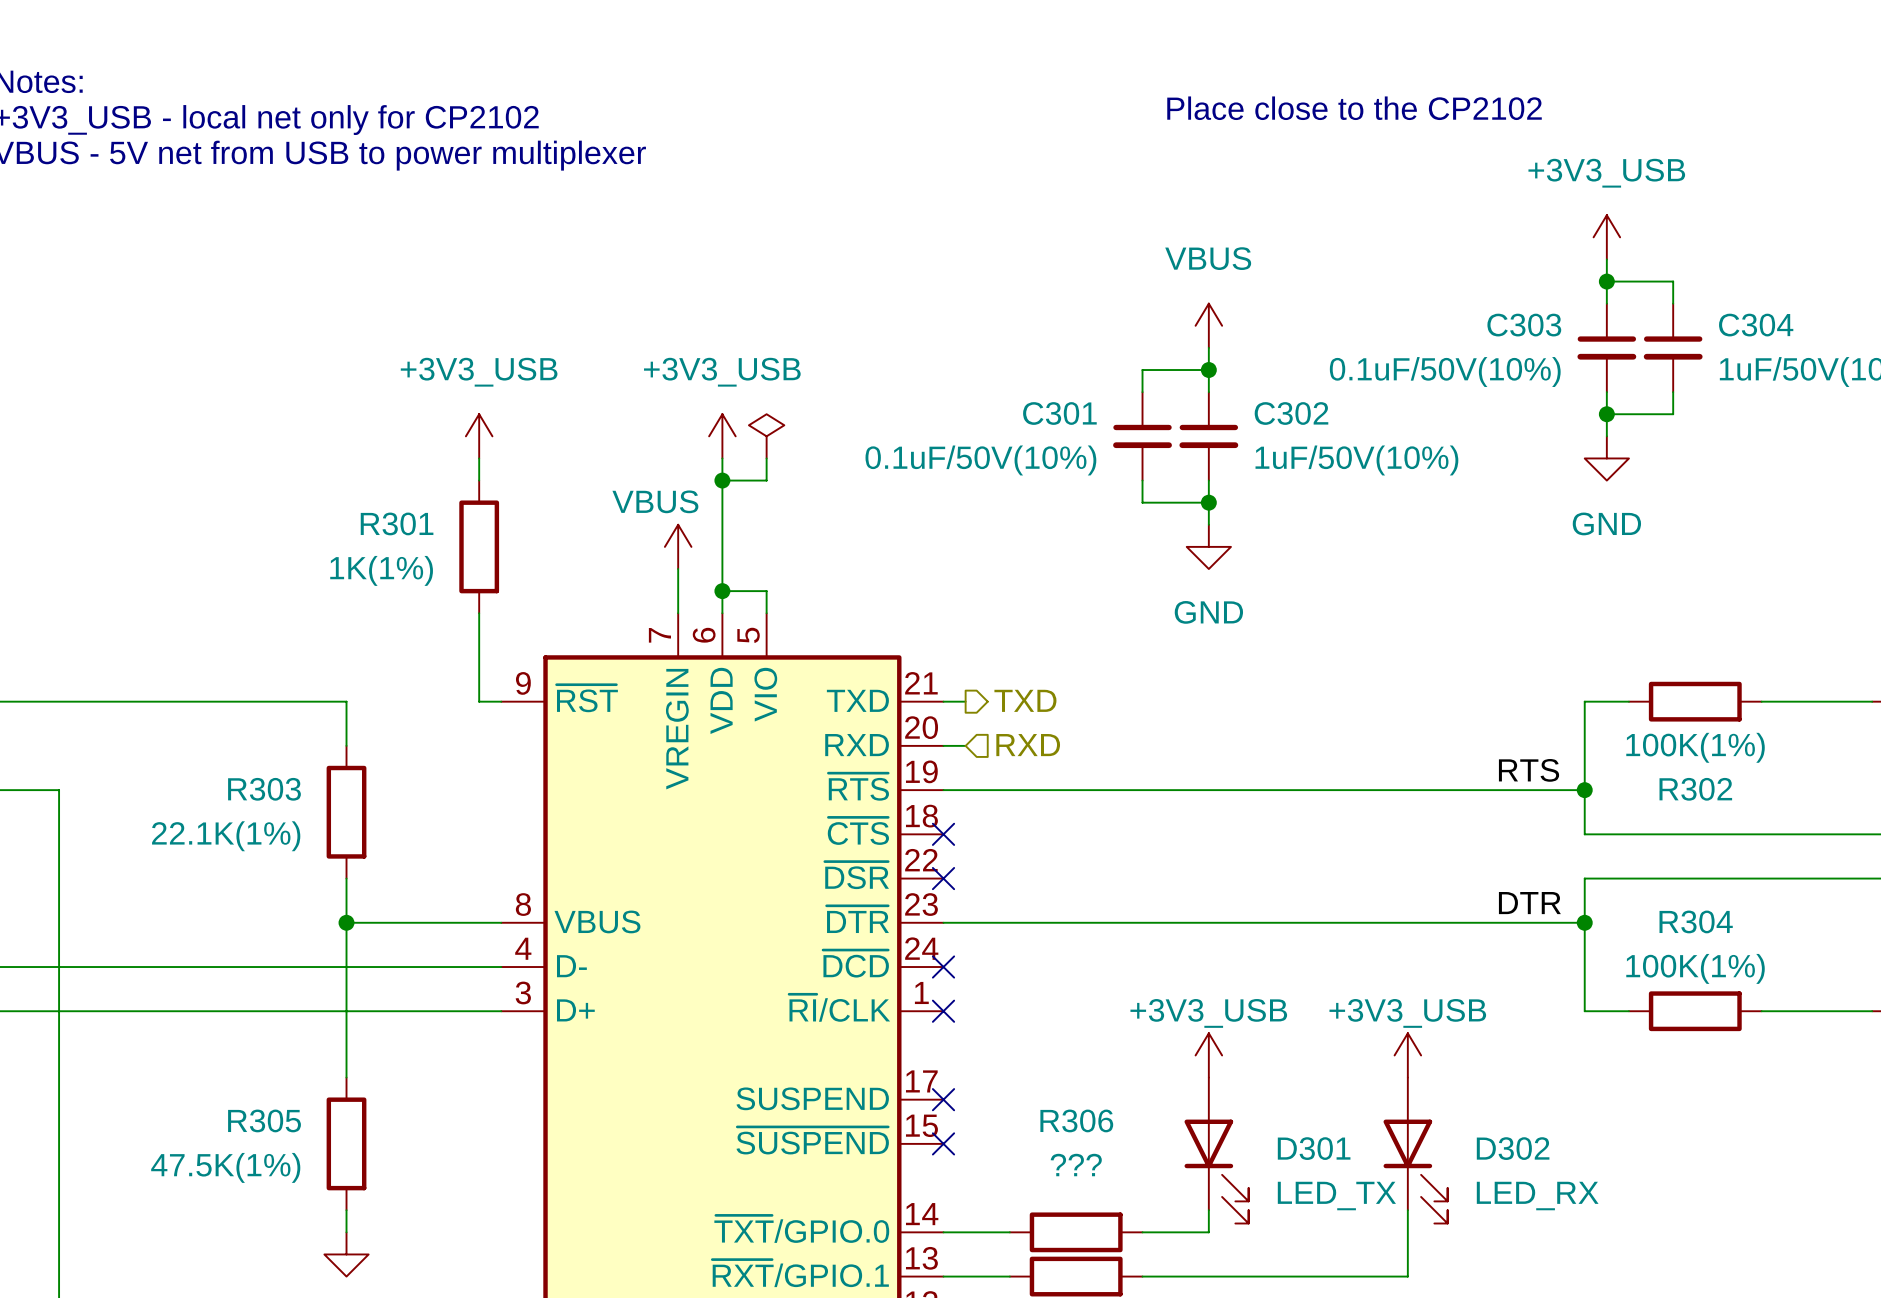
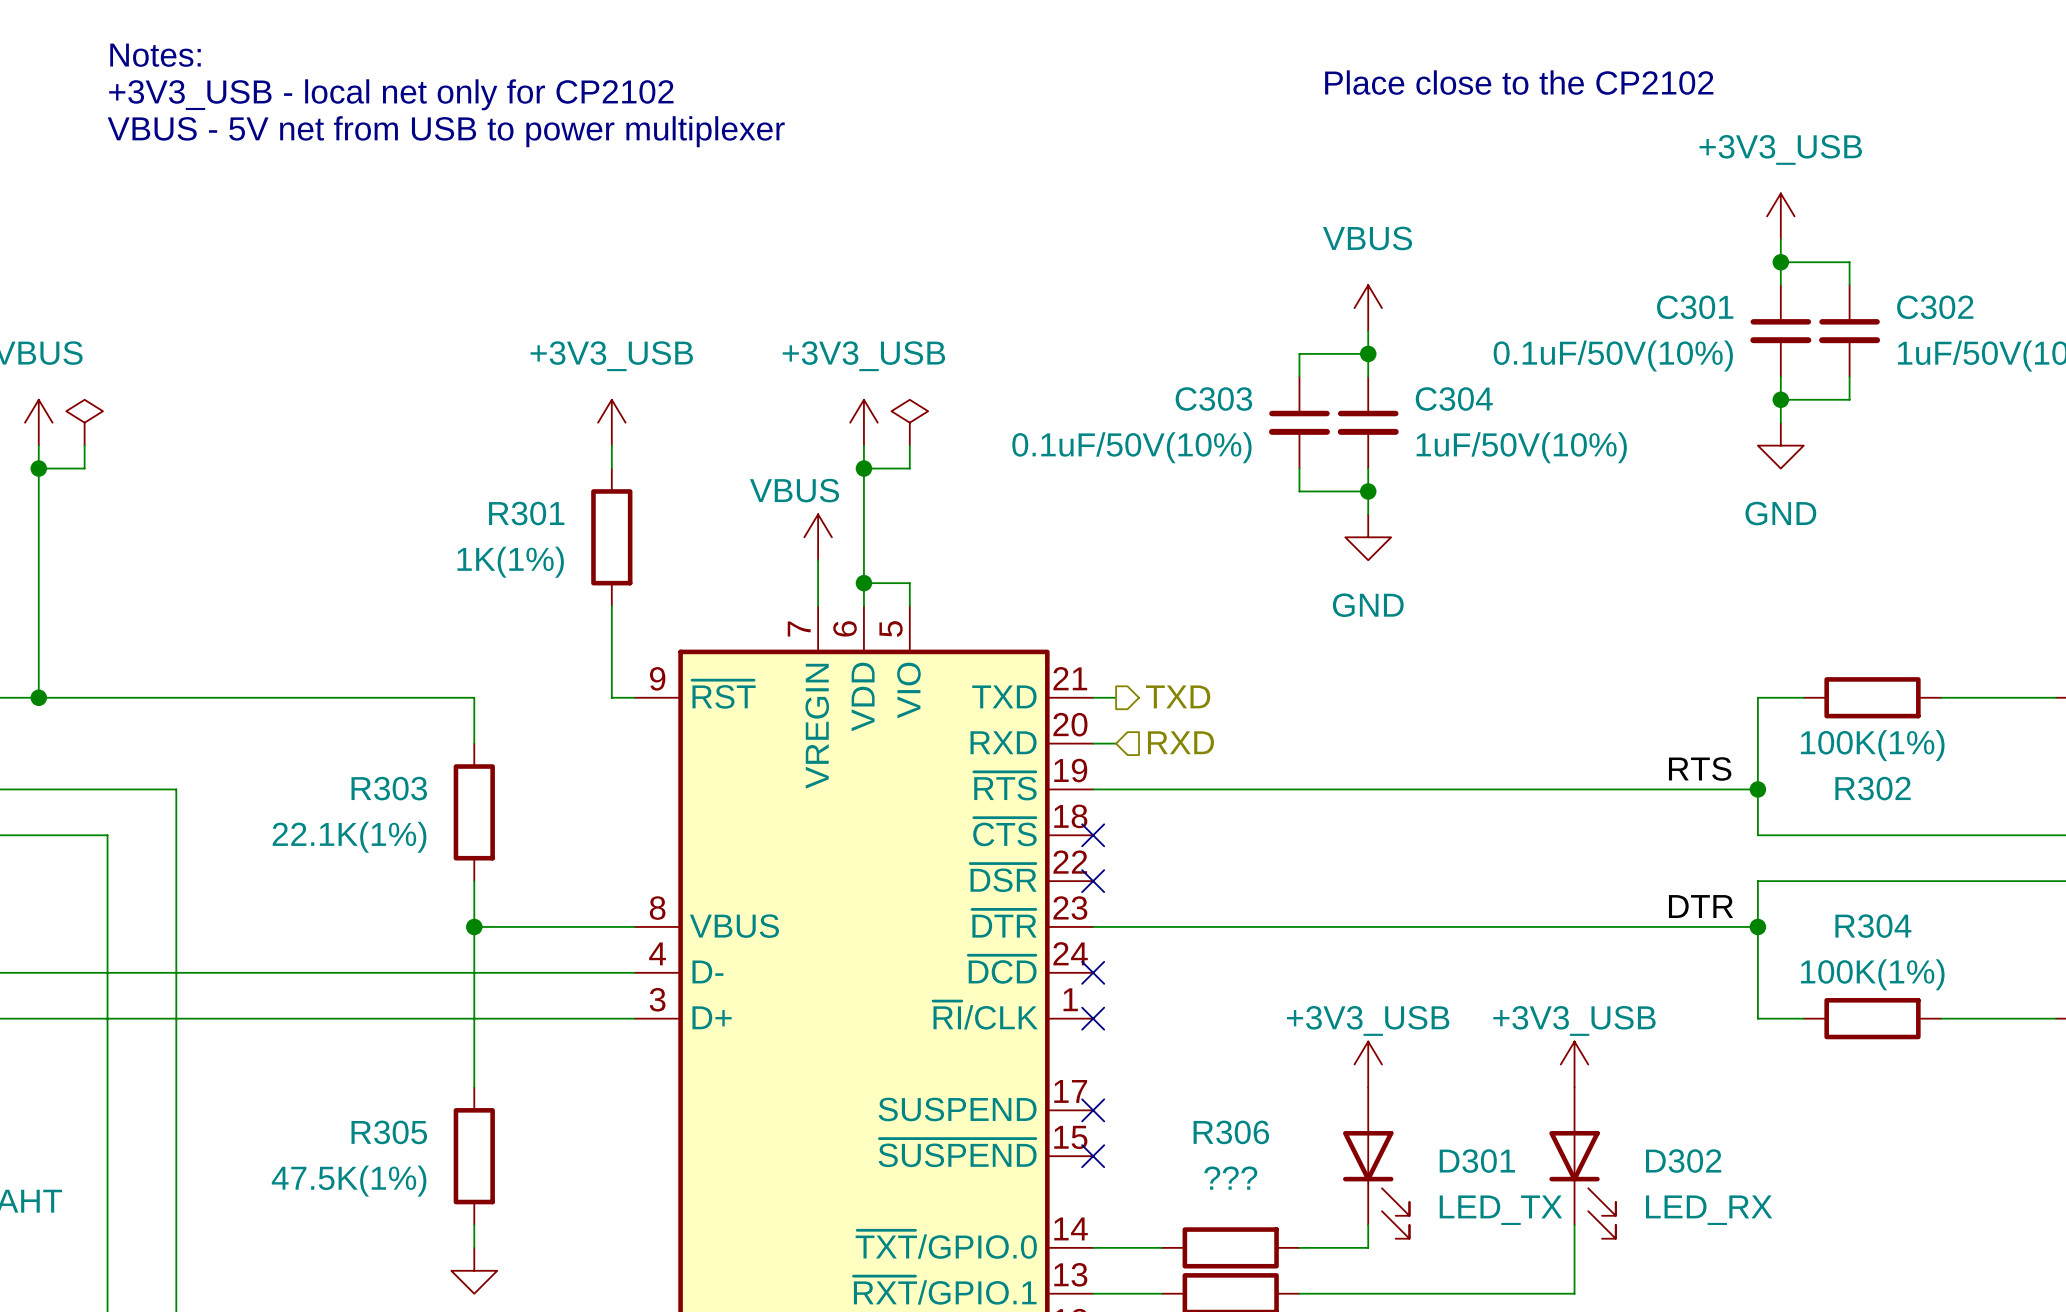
C303 name: C303 (1524, 325) -> C301 (1695, 307)
C304 name: C304 (1756, 325) -> C302 (1935, 307)
C301 name: C301 (1059, 413) -> C303 (1213, 399)
C302 name: C302 (1291, 413) -> C304 (1454, 399)

